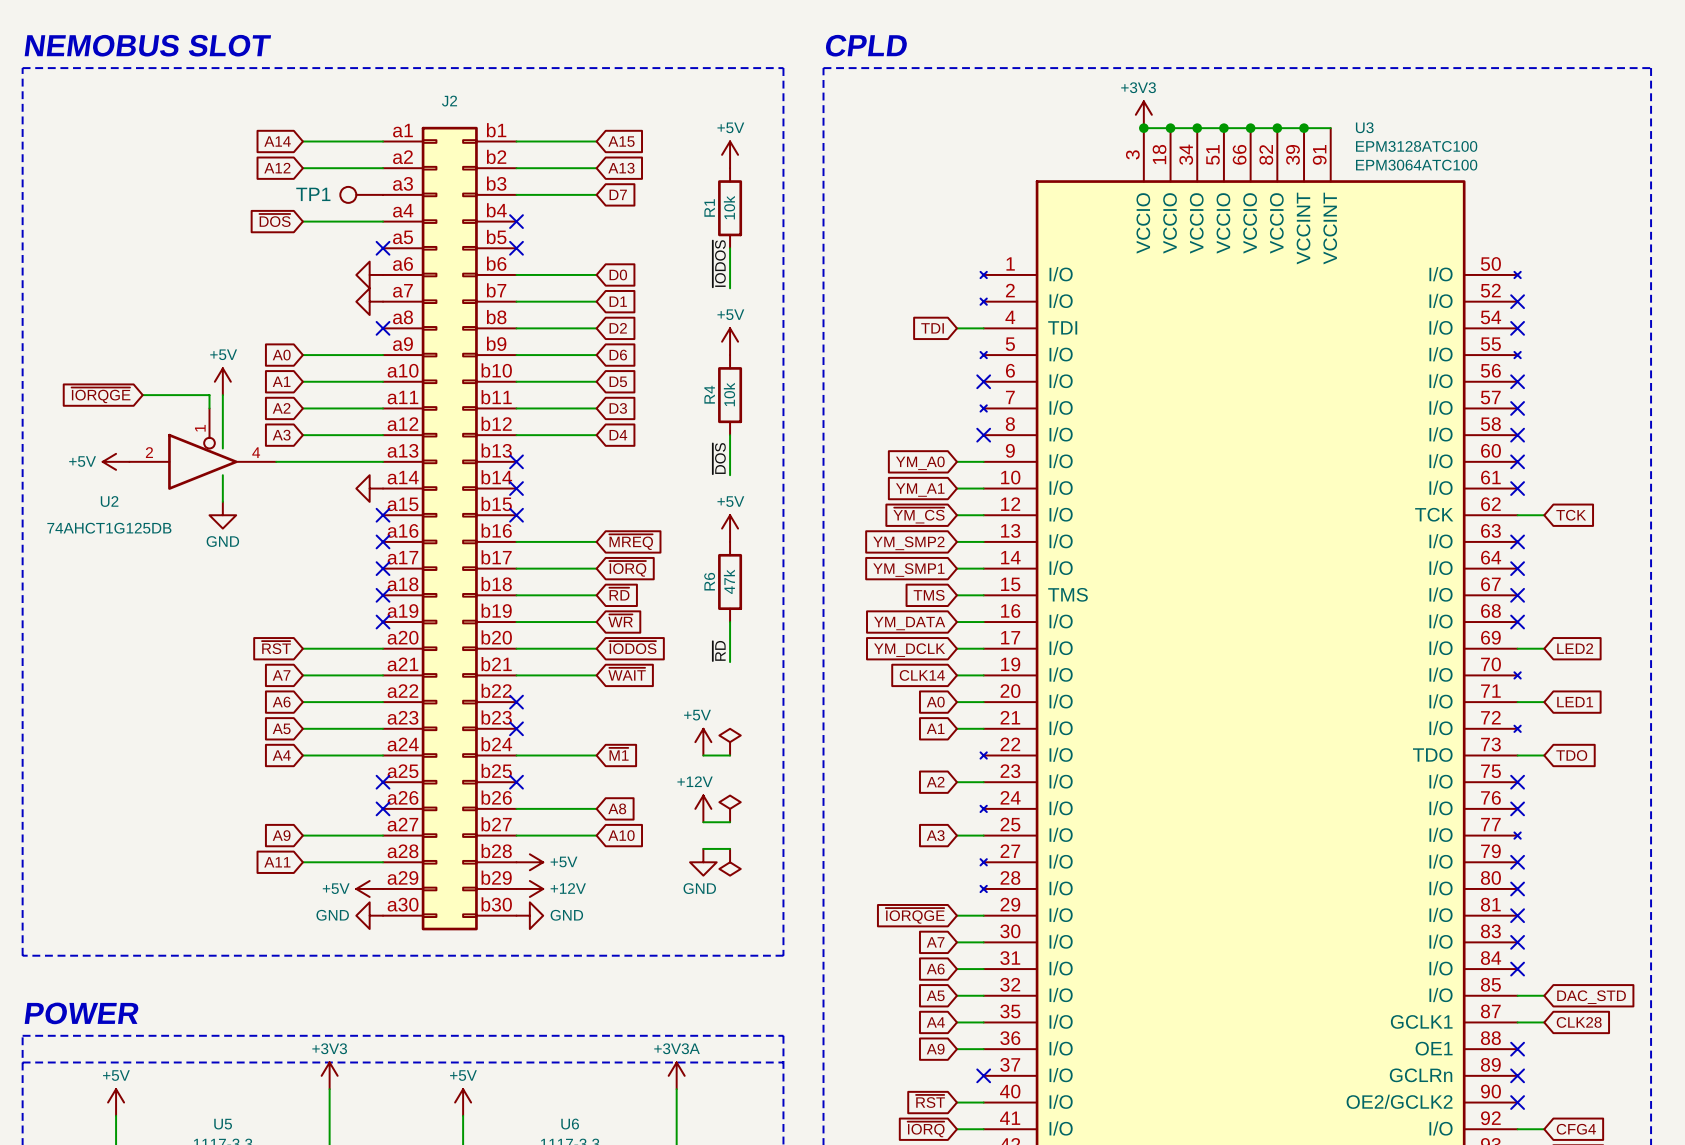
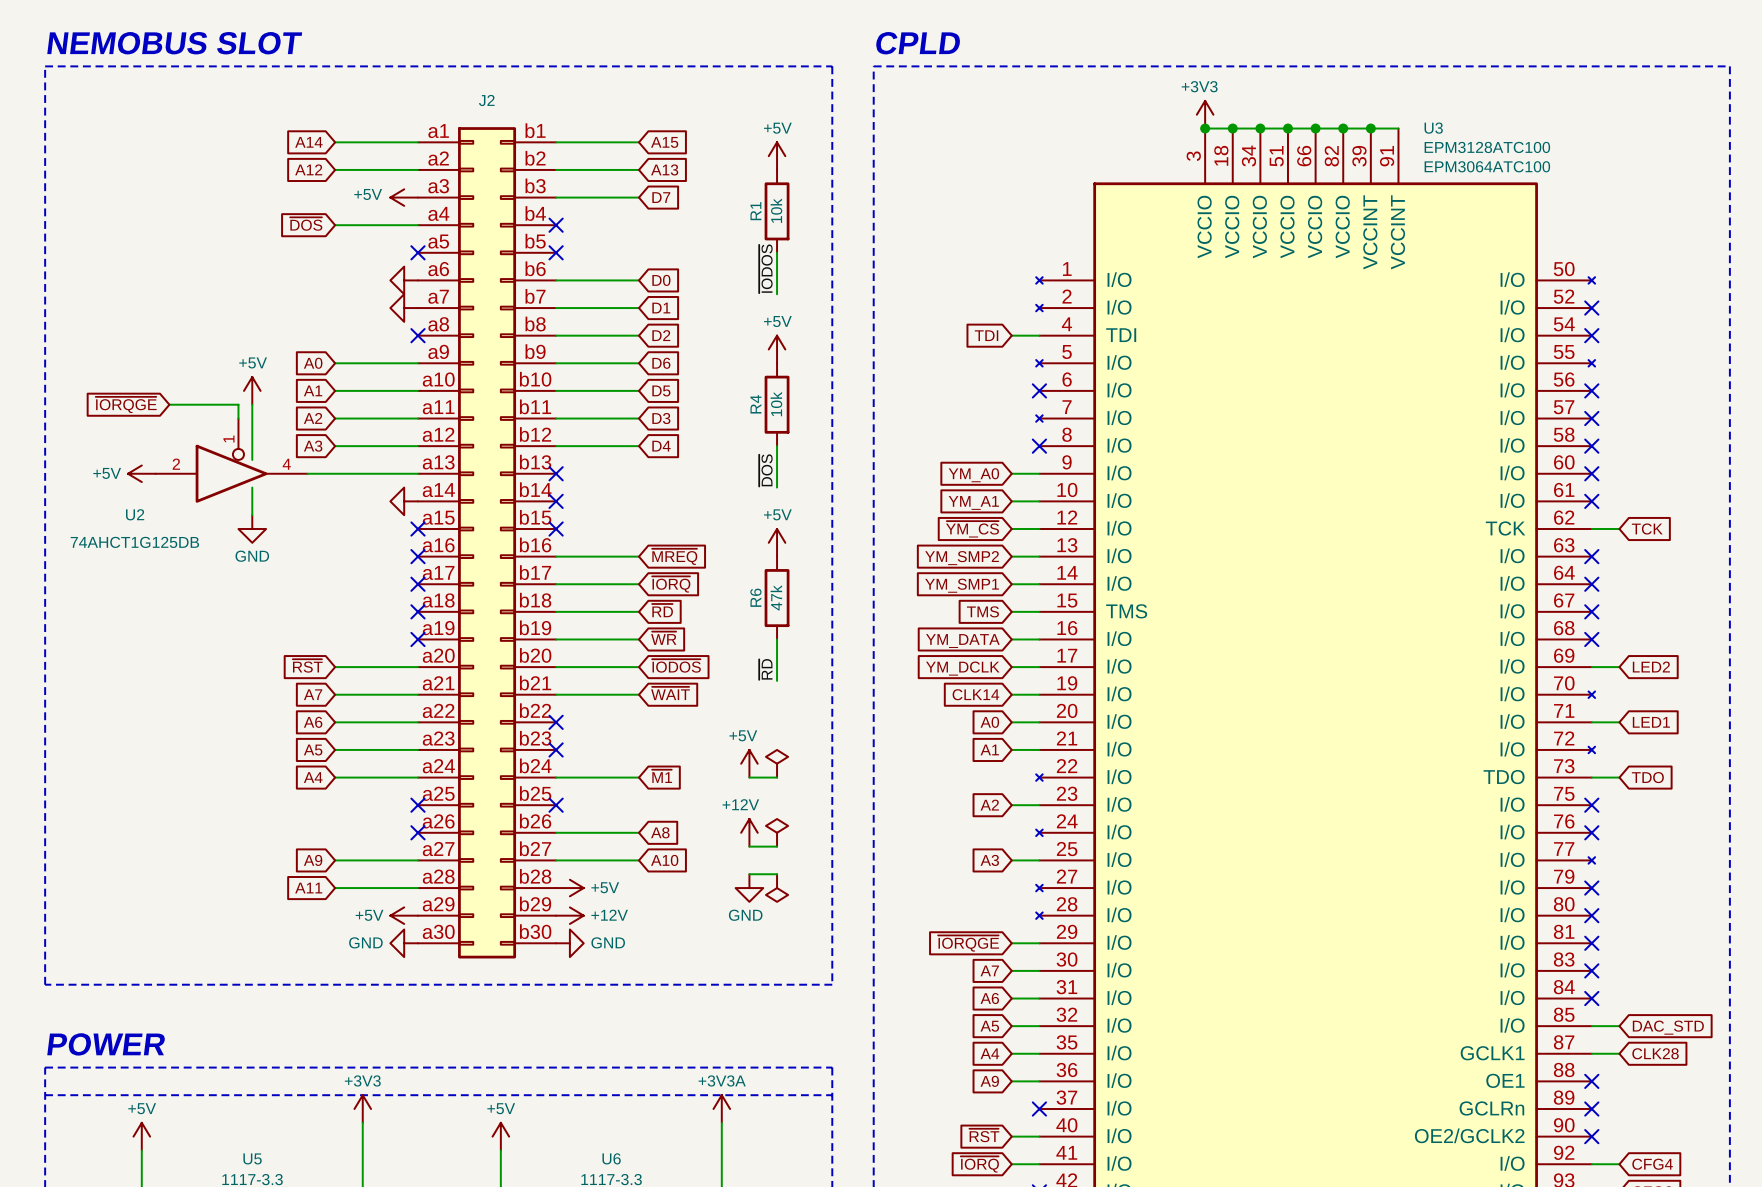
TP1: (361, 194) -> none
power symbol: none -> +5V (404, 197)

